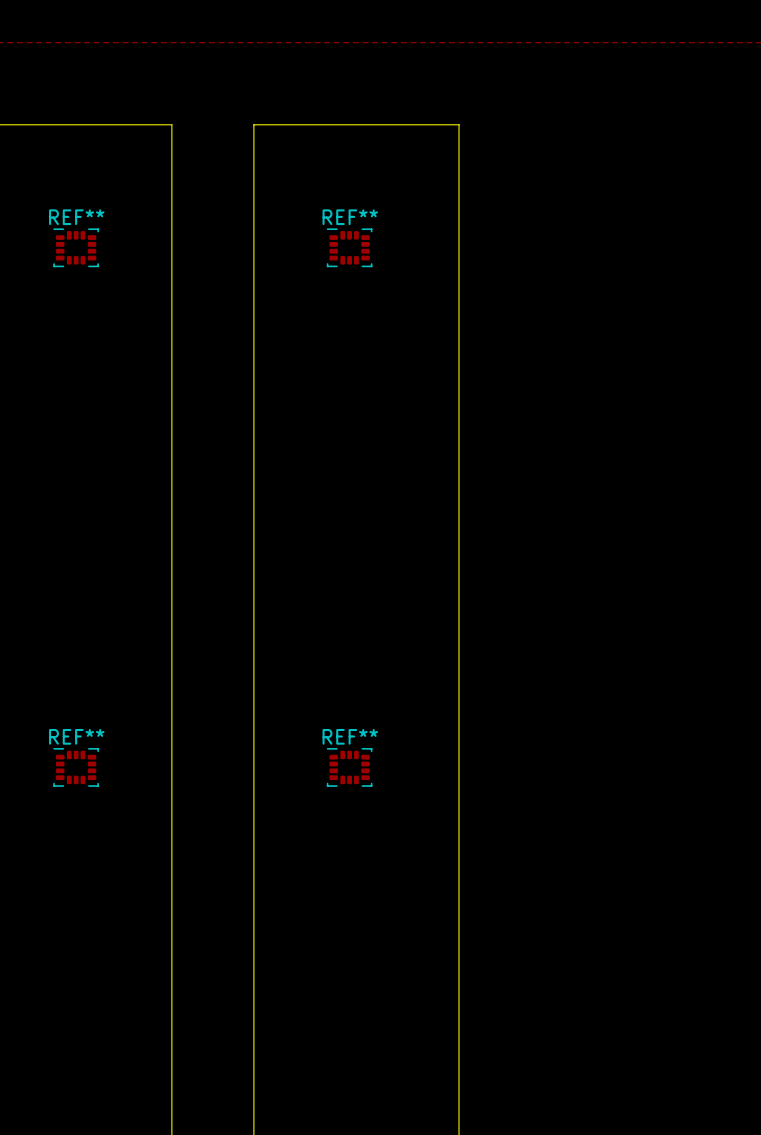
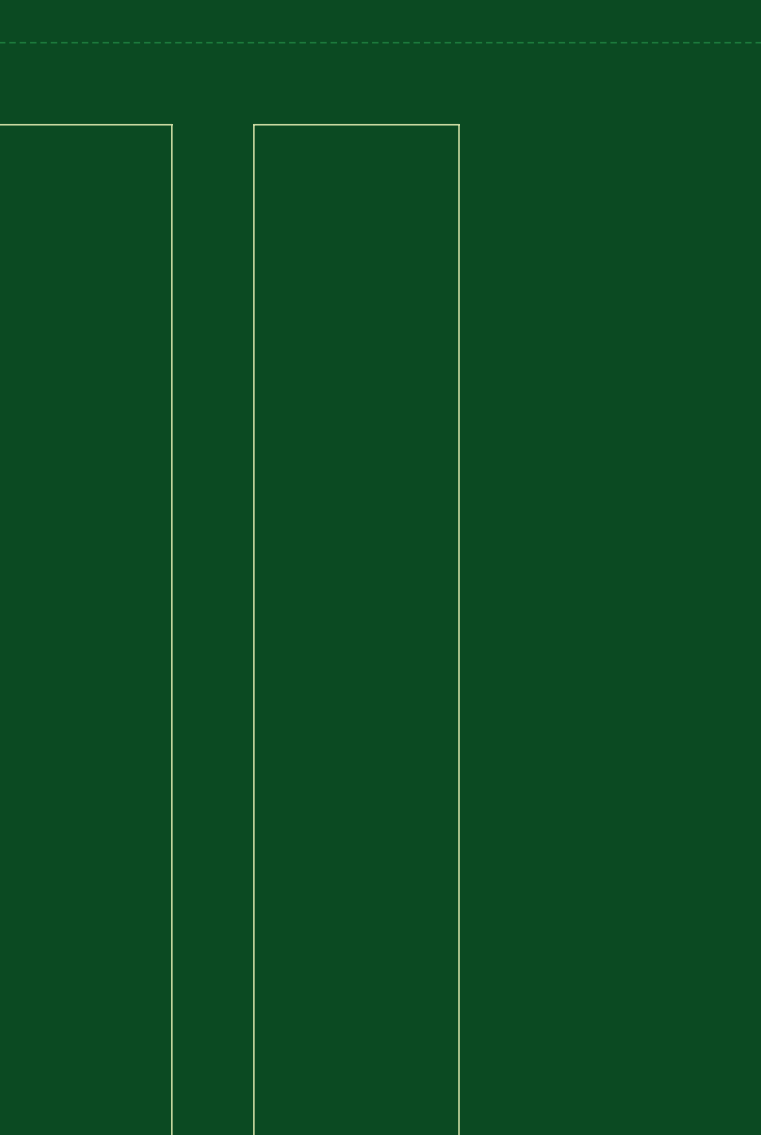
REF**: (76, 247) -> none
REF**: (349, 247) -> none
REF**: (76, 767) -> none
REF**: (349, 767) -> none

